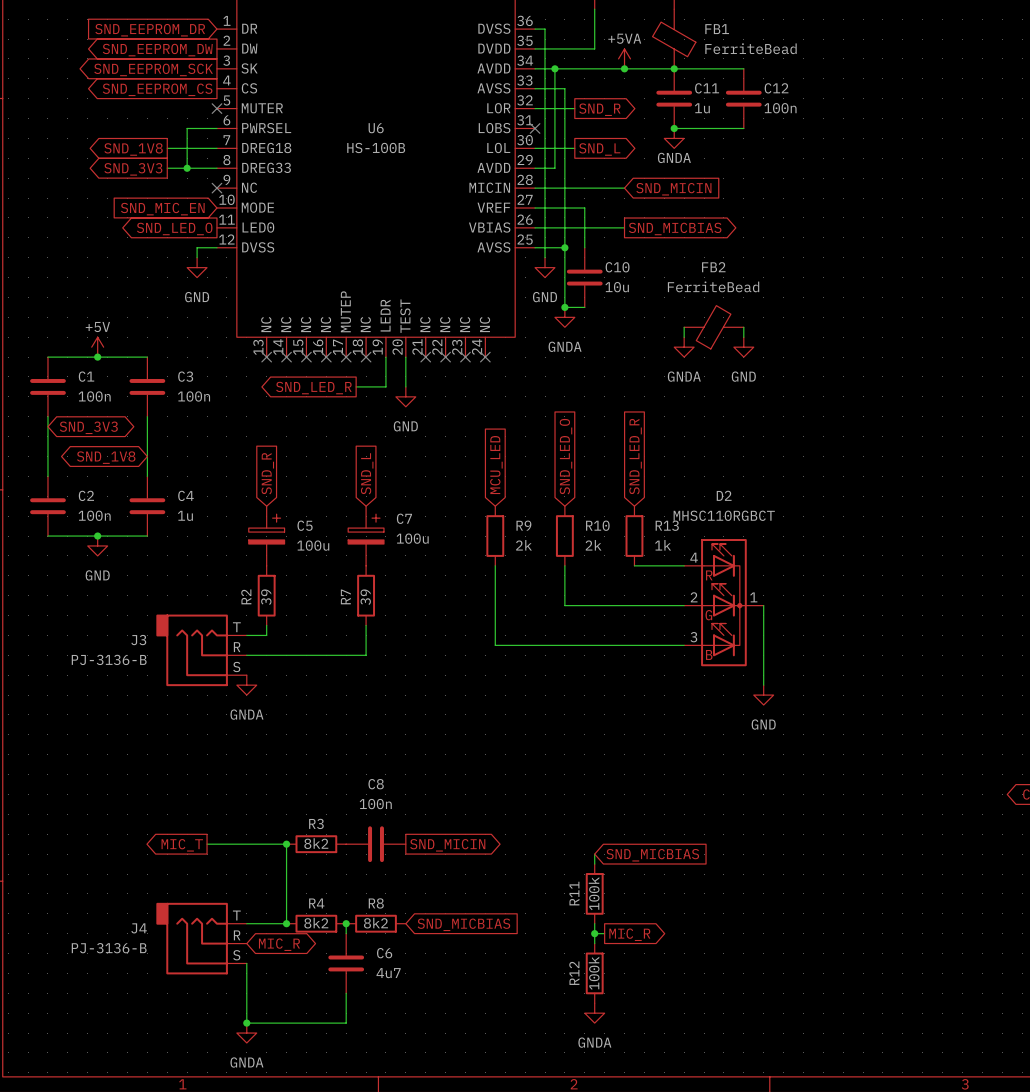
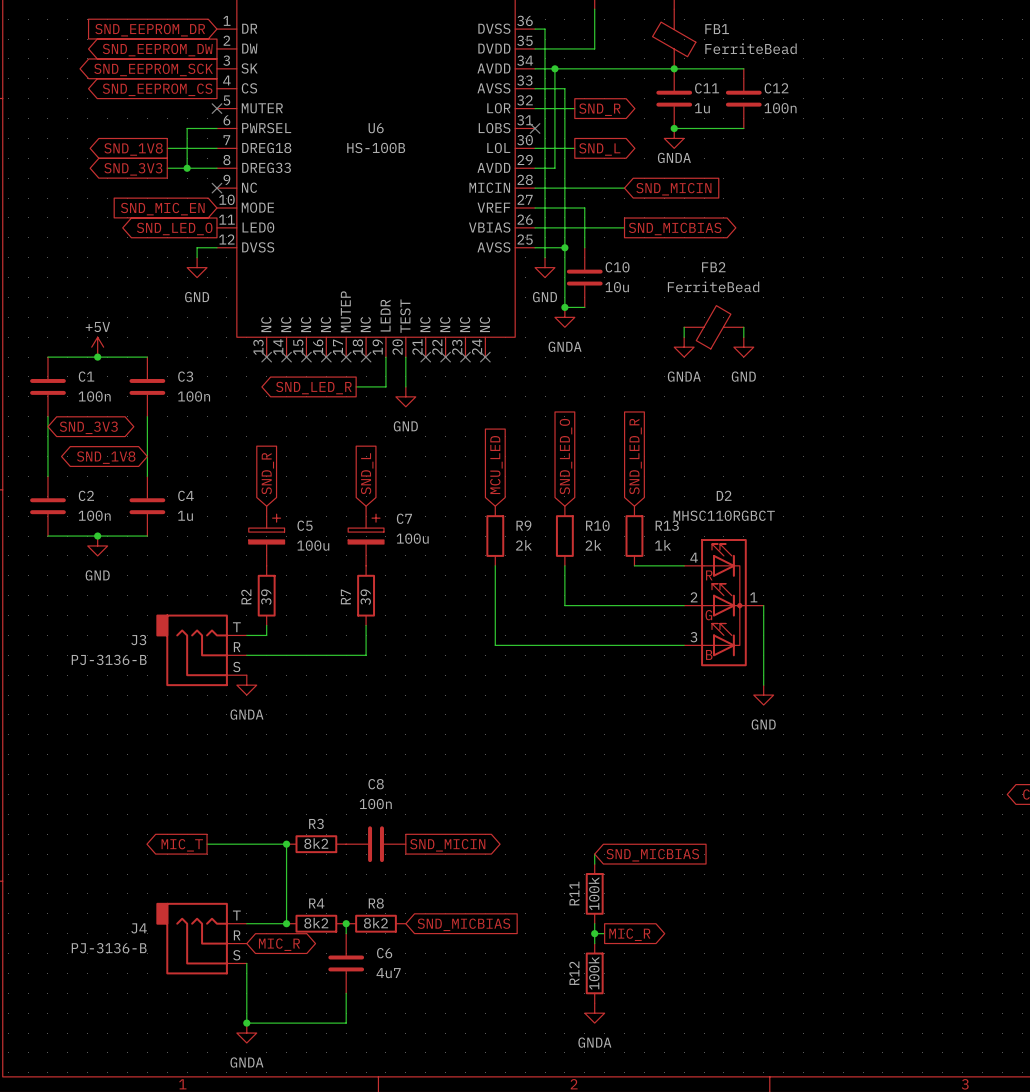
power symbol: +5VA (624, 58) -> none
junction: (624, 68) -> none

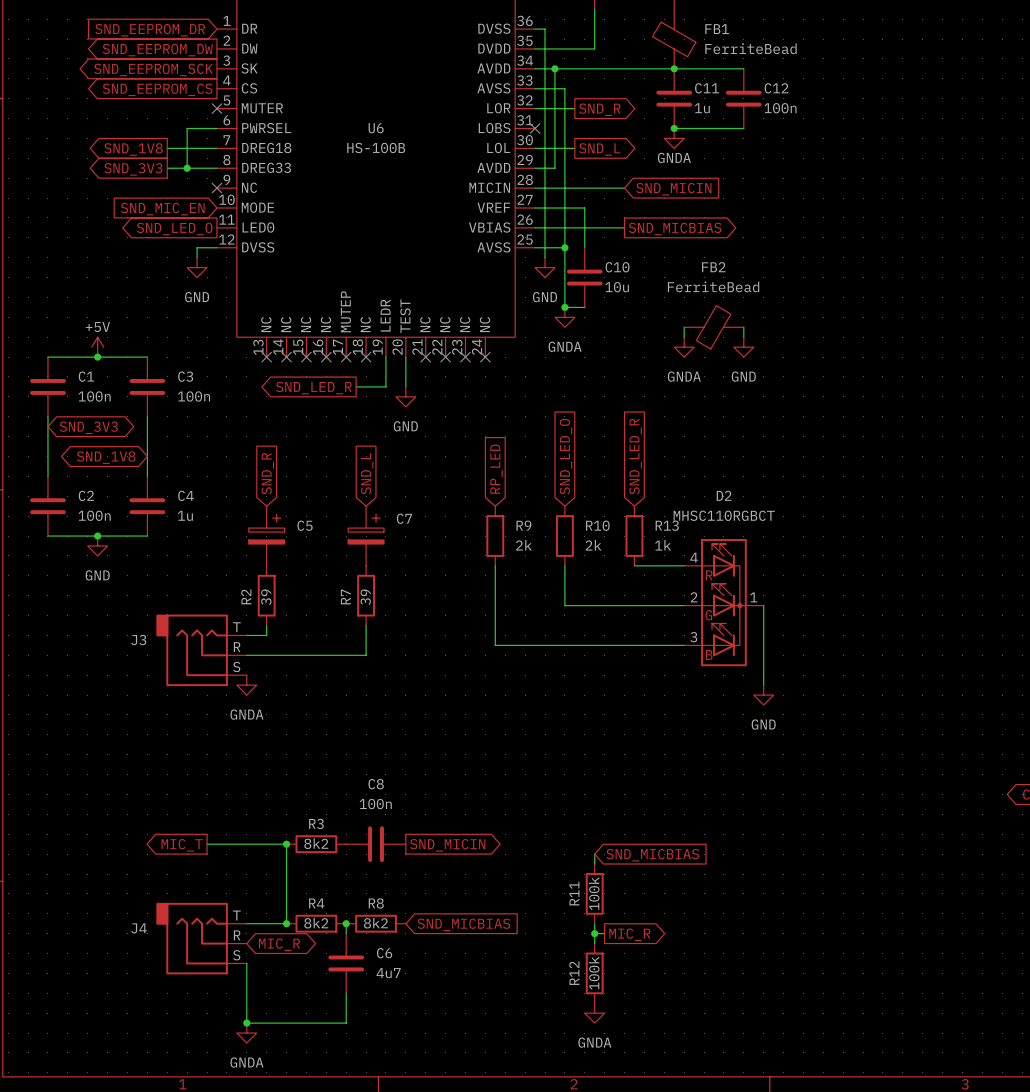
global label: MCU_LED (496, 465) -> RP_LED (496, 469)
C7 value: 100u (412, 538) -> none
C5 value: 100u (313, 545) -> none
J3 value: PJ-3136-B (109, 659) -> none
J4 value: PJ-3136-B (109, 948) -> none

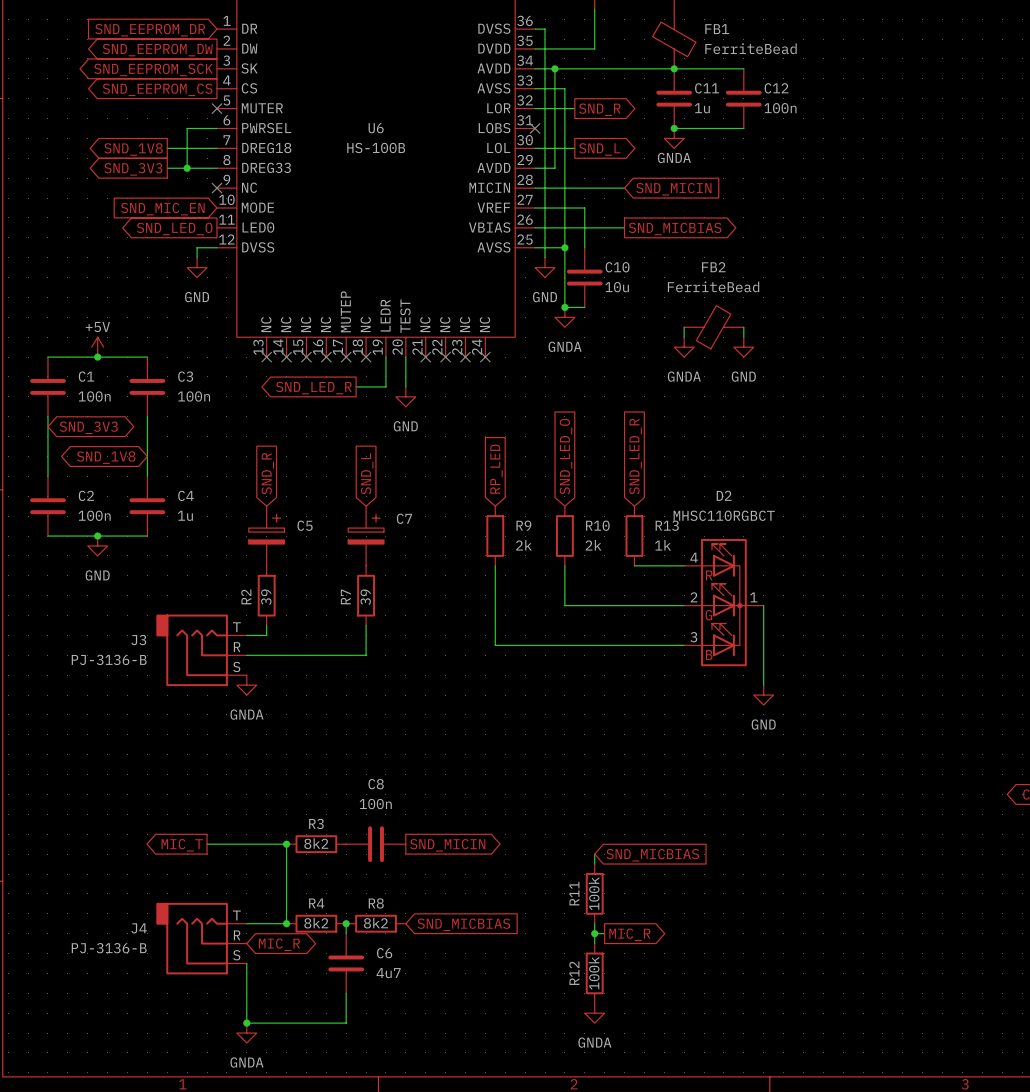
J3 value: none -> PJ-3136-B (109, 659)
J4 value: none -> PJ-3136-B (109, 948)

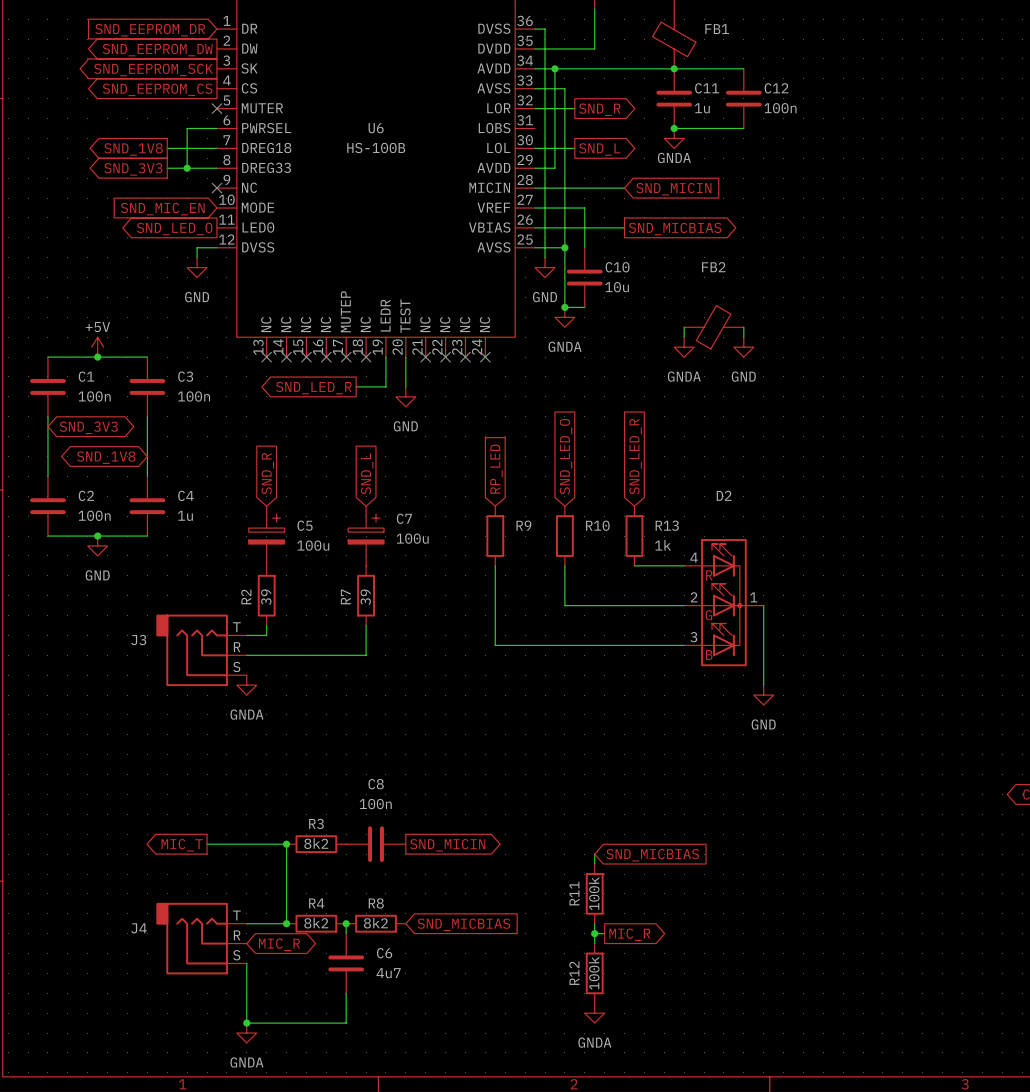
FB1 value: FerriteBead (751, 48) -> none
no-connect mark: (535, 128) -> none
FB2 value: FerriteBead (713, 286) -> none
D2 value: MHSC110RGBCT (724, 515) -> none
C7 value: none -> 100u (412, 538)
C5 value: none -> 100u (313, 545)
R9 value: 2k (524, 545) -> none
R10 value: 2k (593, 545) -> none
J3 value: PJ-3136-B (109, 659) -> none
J4 value: PJ-3136-B (109, 948) -> none

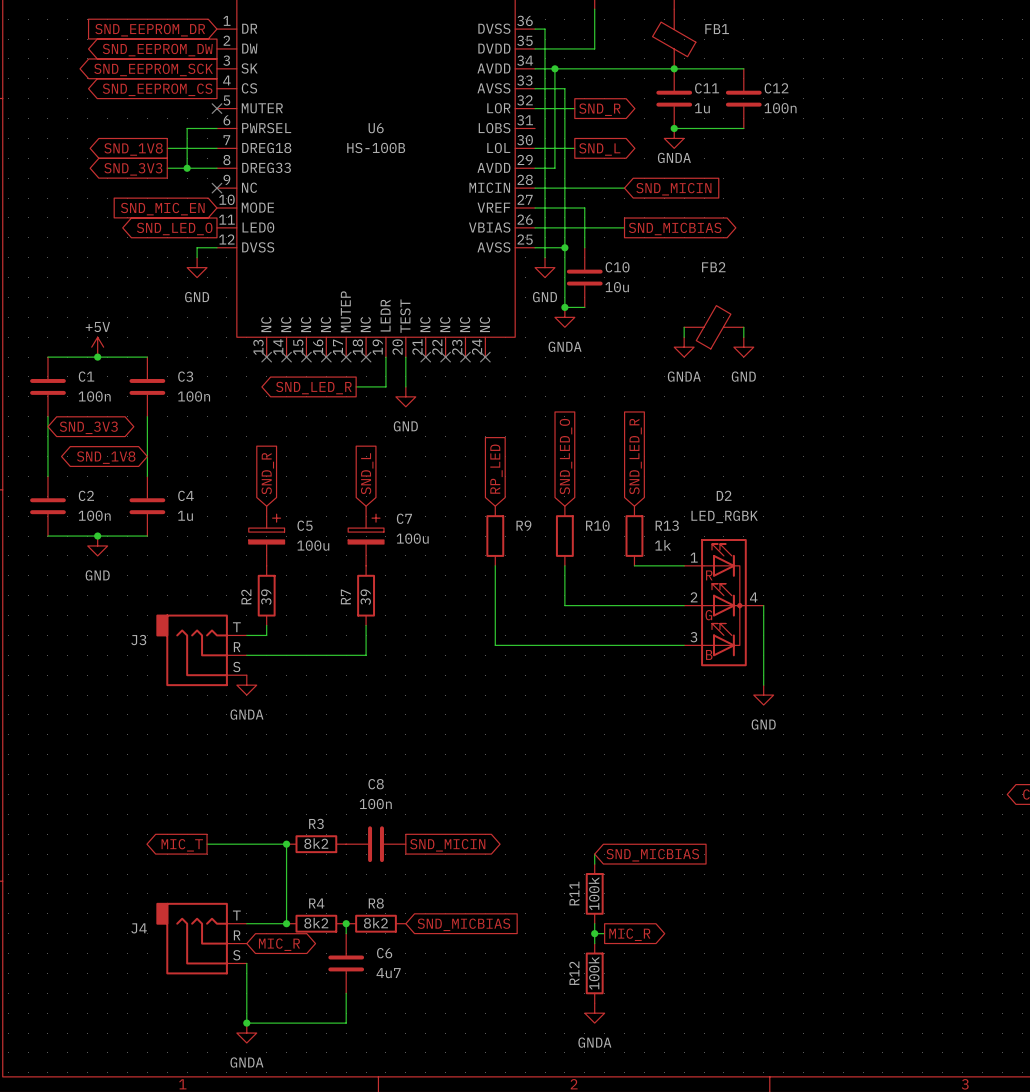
D2 value: none -> LED_RGBK (724, 516)
D2 pin number: 4 (694, 557) -> 1 (694, 557)
D2 pin number: 1 (753, 597) -> 4 (753, 597)

